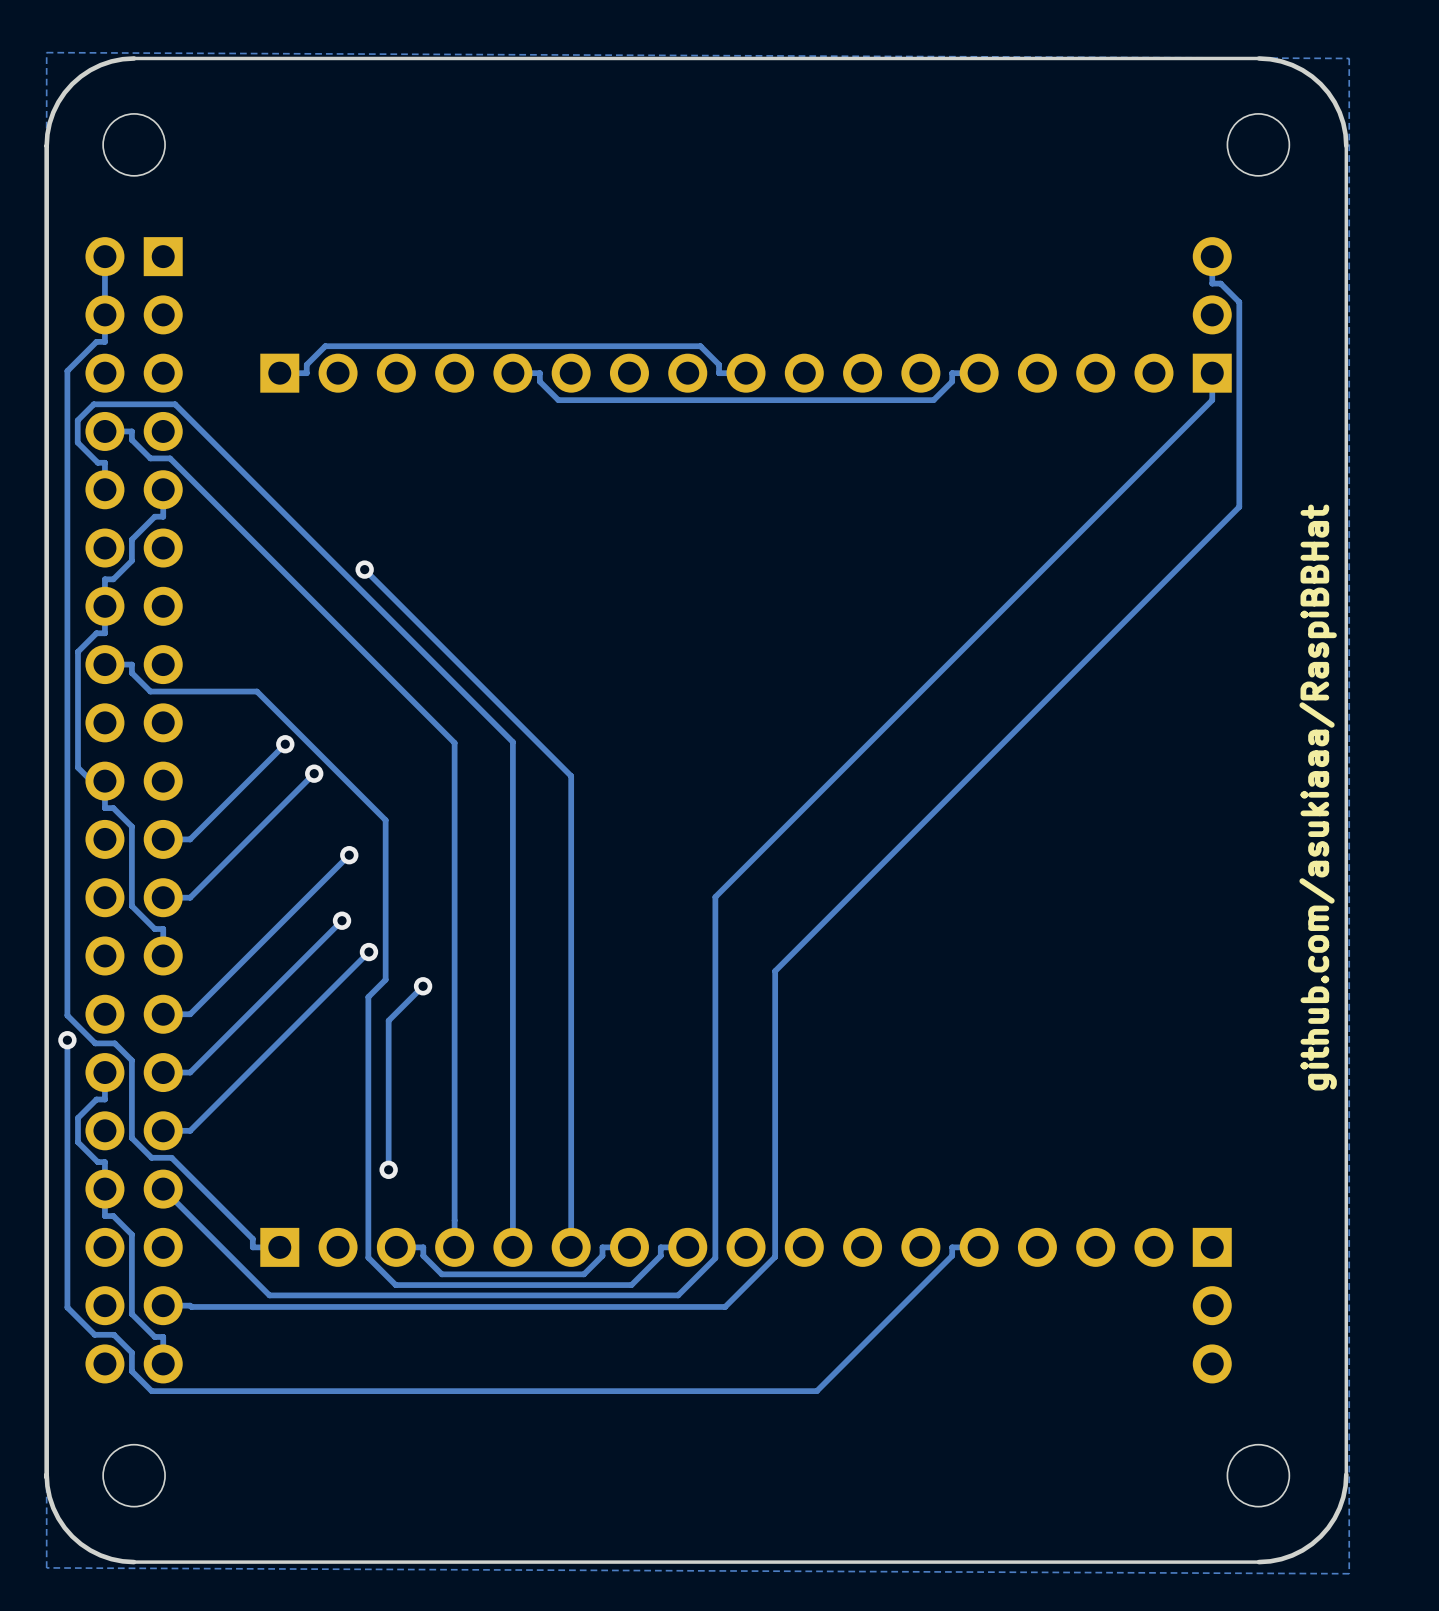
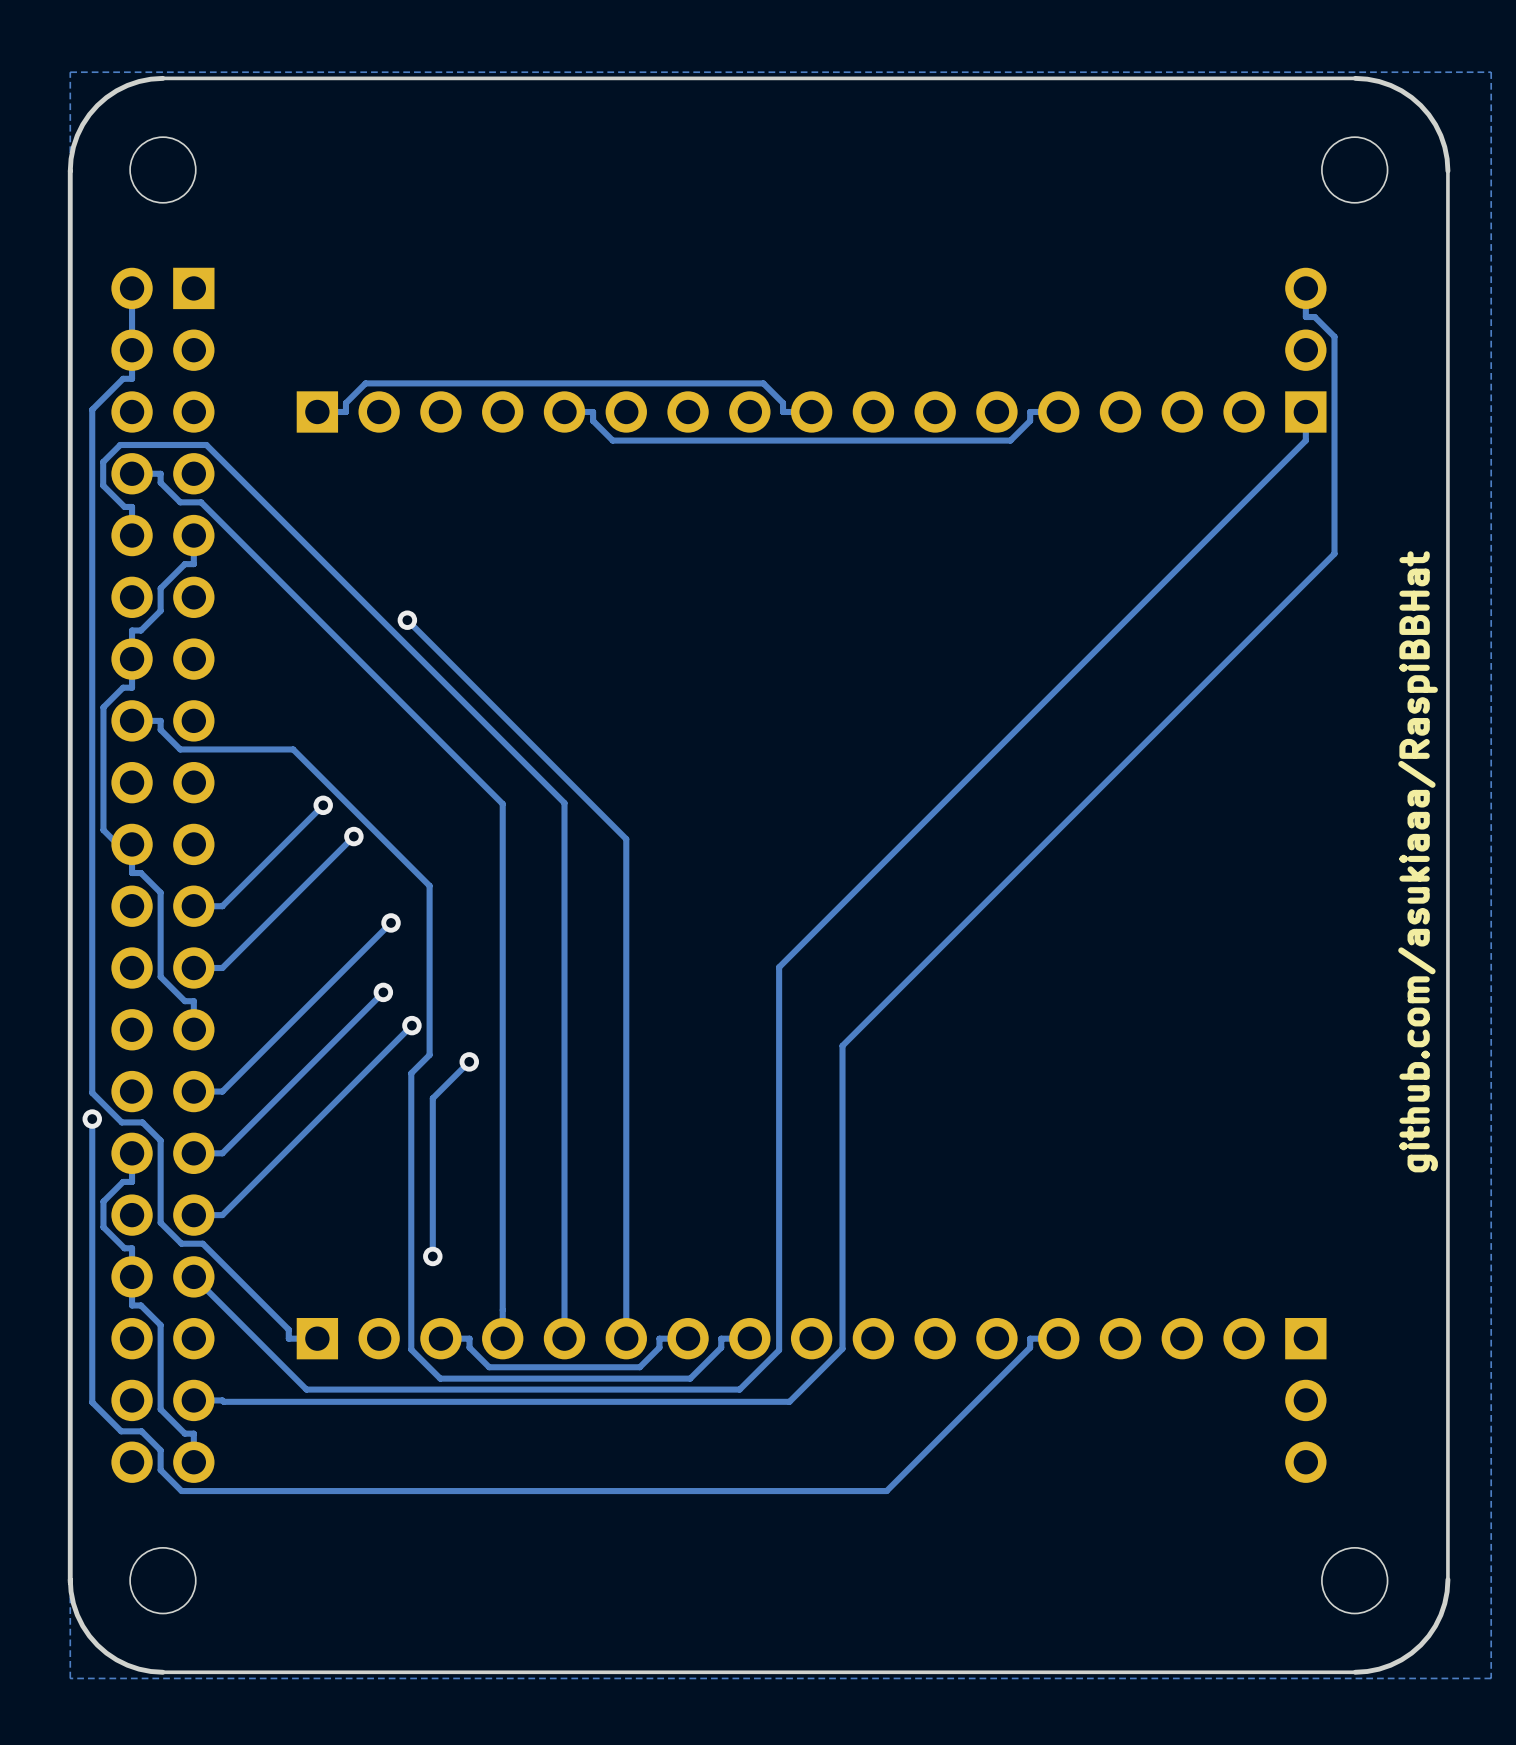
zone outline: (46, 52) (1349, 58) (1349, 1573) (46, 1567) -> (70, 72) (1491, 72) (1491, 1678) (70, 1678)

